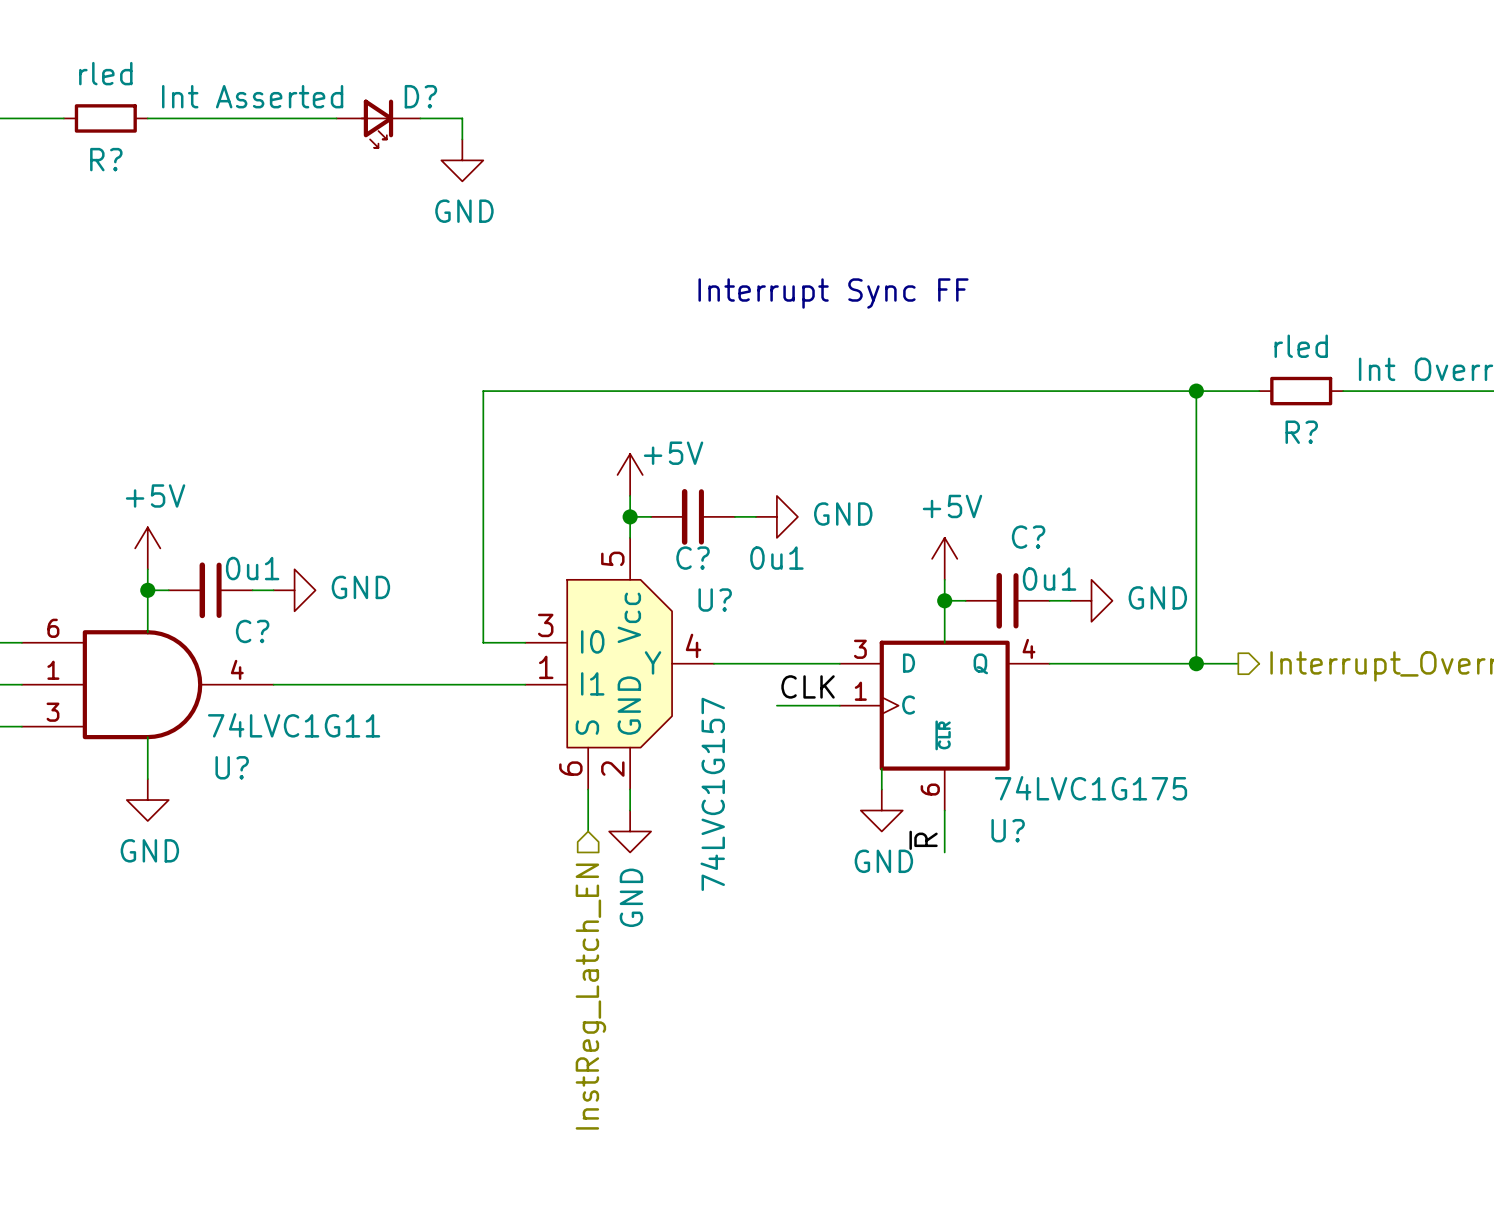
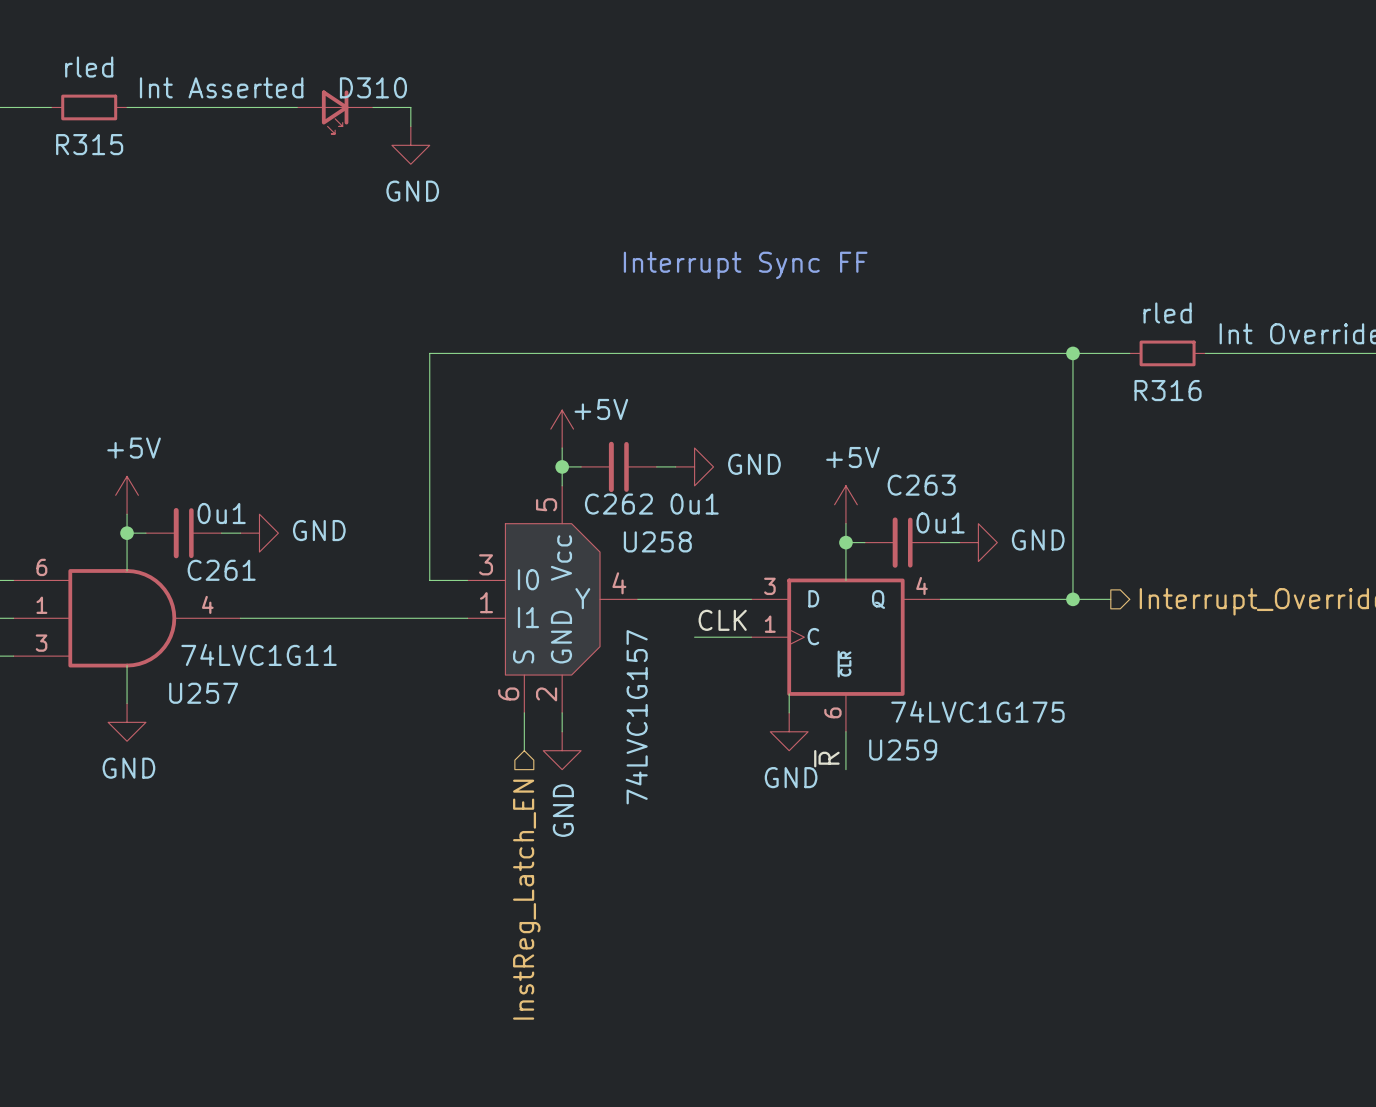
D? name: D? (420, 96) -> D310 (373, 87)
R? name: R? (106, 159) -> R315 (89, 144)
R? name: R? (1301, 432) -> R316 (1168, 390)
C? name: C? (1028, 537) -> C263 (921, 485)
C? name: C? (693, 558) -> C262 (618, 504)
U? name: U? (715, 600) -> U258 (657, 541)
C? name: C? (252, 631) -> C261 (221, 570)
U? name: U? (232, 767) -> U257 (203, 693)
U? name: U? (1008, 830) -> U259 (903, 750)

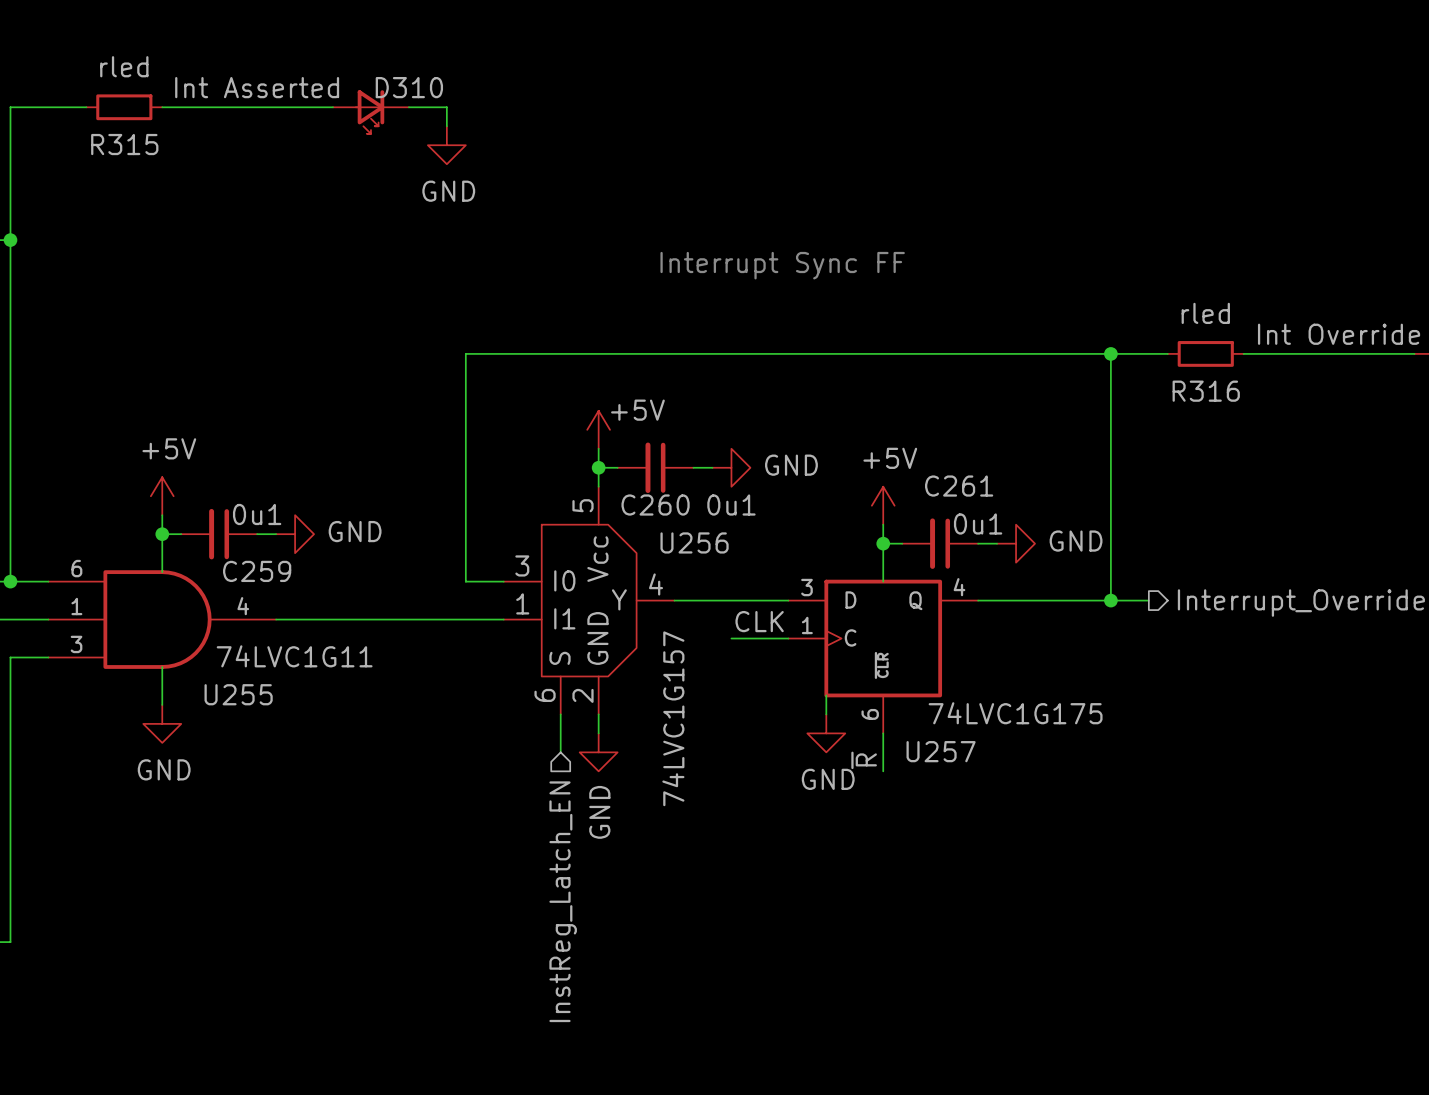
C263 name: C263 (921, 485) -> C261 (959, 486)
C262 name: C262 (618, 504) -> C260 (655, 505)
U258 name: U258 (657, 541) -> U256 (694, 542)
C261 name: C261 (221, 570) -> C259 (257, 571)
U257 name: U257 (203, 693) -> U255 (238, 694)
U259 name: U259 (903, 750) -> U257 (941, 751)

